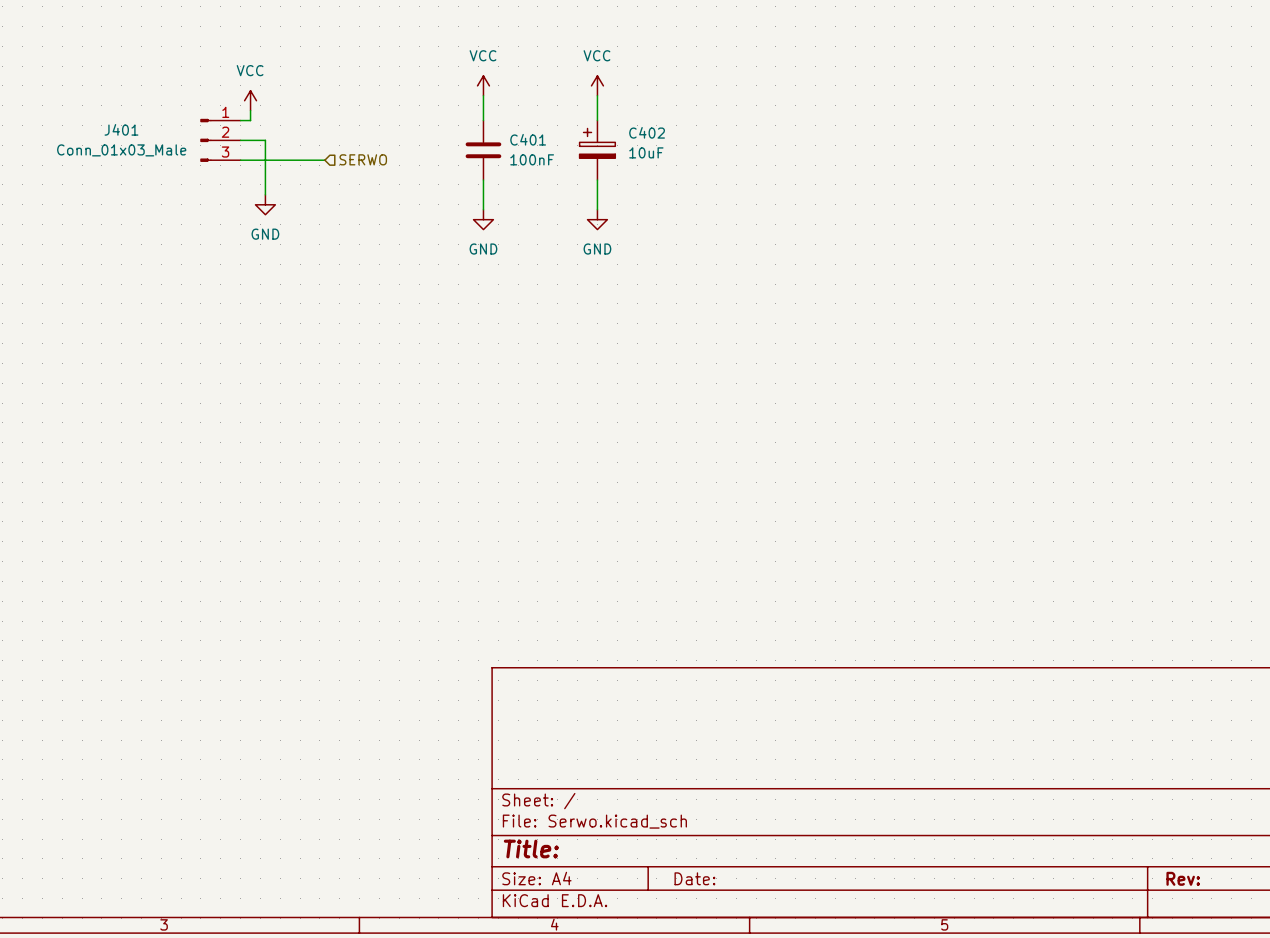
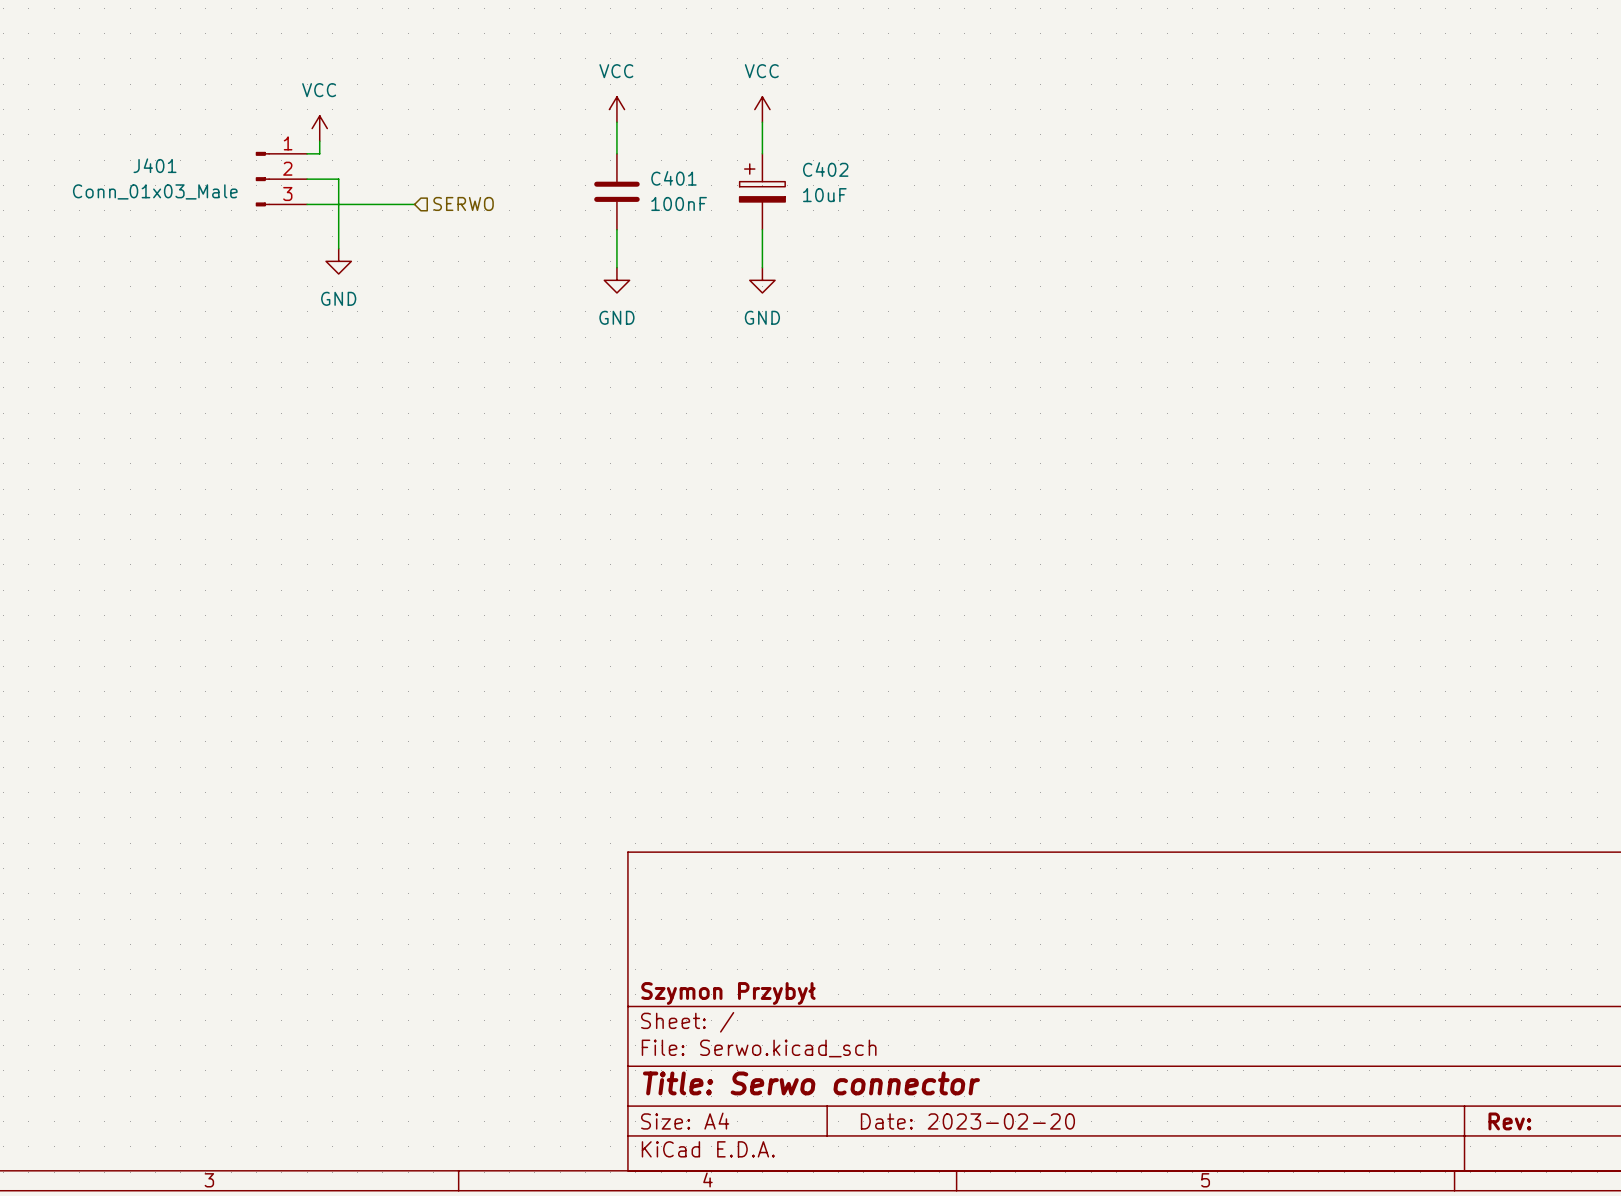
title block: none -> Szymon Przybył (728, 993)
title block: Title: (531, 849) -> Title: Serwo connector (811, 1083)
title block: Date: (694, 878) -> Date: 2023-02-20 (967, 1121)

